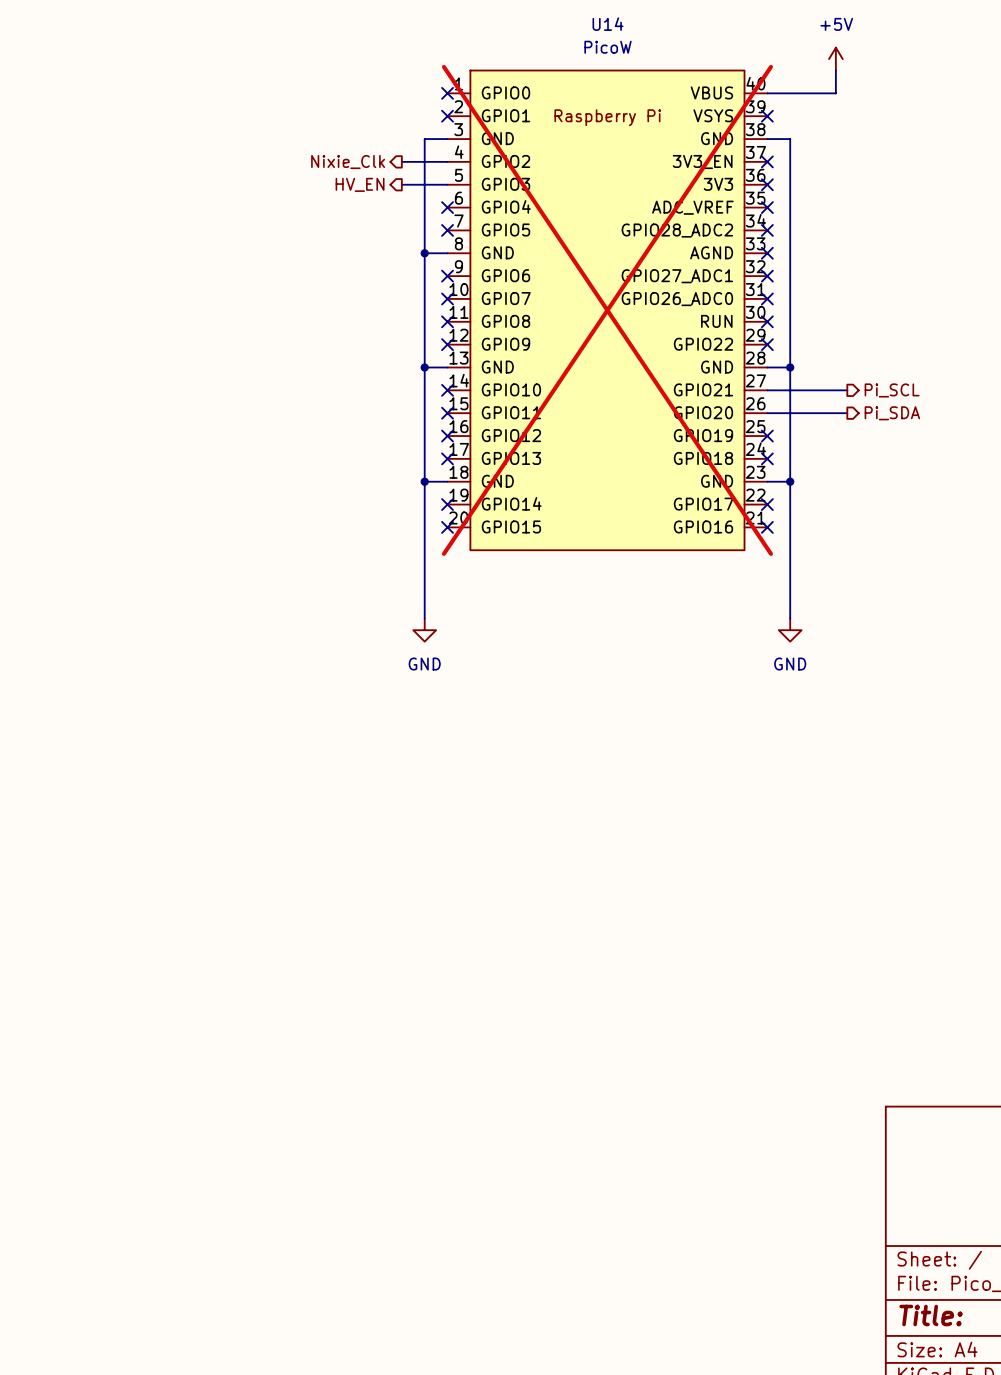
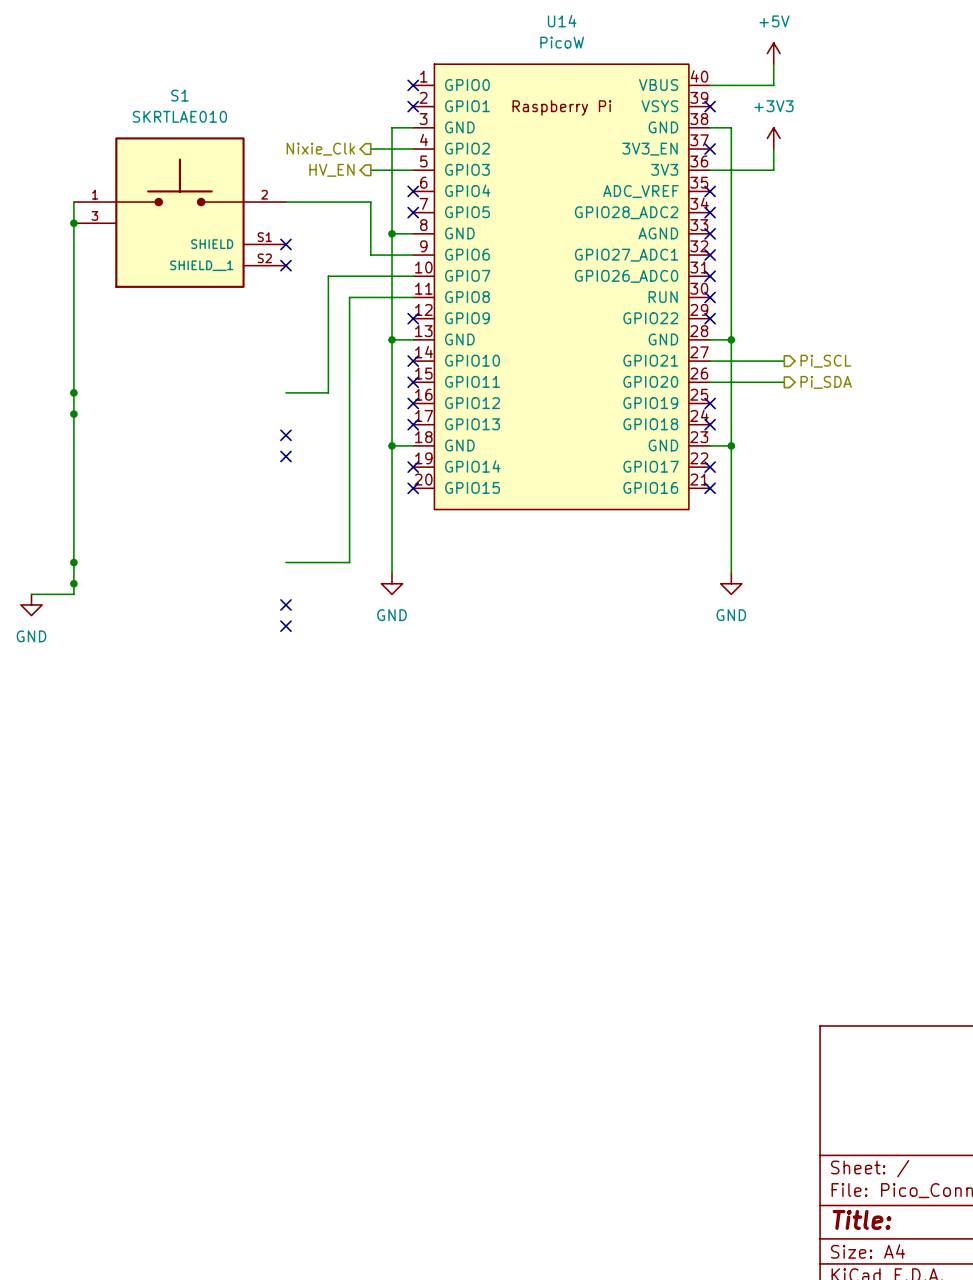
power symbol: none -> +3V3 (773, 138)
wire: none -> (773, 149) (773, 170) (710, 170)
no-connect mark: (767, 184) -> none
wire: none -> (73, 202) (73, 594) (31, 594)
wire: none -> (285, 202) (370, 202) (370, 255) (413, 255)
S1: none -> SKRTLAE010 (179, 212)
junction: none -> (73, 223)
no-connect mark: none -> (285, 244)
no-connect mark: (447, 276) -> none
no-connect mark: none -> (285, 265)
wire: none -> (413, 276) (328, 276) (328, 392) (285, 392)
no-connect mark: (447, 298) -> none
U14 do-not-place cross: (607, 310) -> none
wire: none -> (413, 297) (349, 297) (349, 562) (285, 562)
no-connect mark: (447, 321) -> none
junction: none -> (73, 392)
junction: none -> (73, 414)
no-connect mark: none -> (285, 435)
no-connect mark: none -> (285, 456)
junction: none -> (73, 562)
junction: none -> (73, 583)
power symbol: none -> GND (31, 604)
no-connect mark: none -> (285, 604)
no-connect mark: none -> (285, 626)

